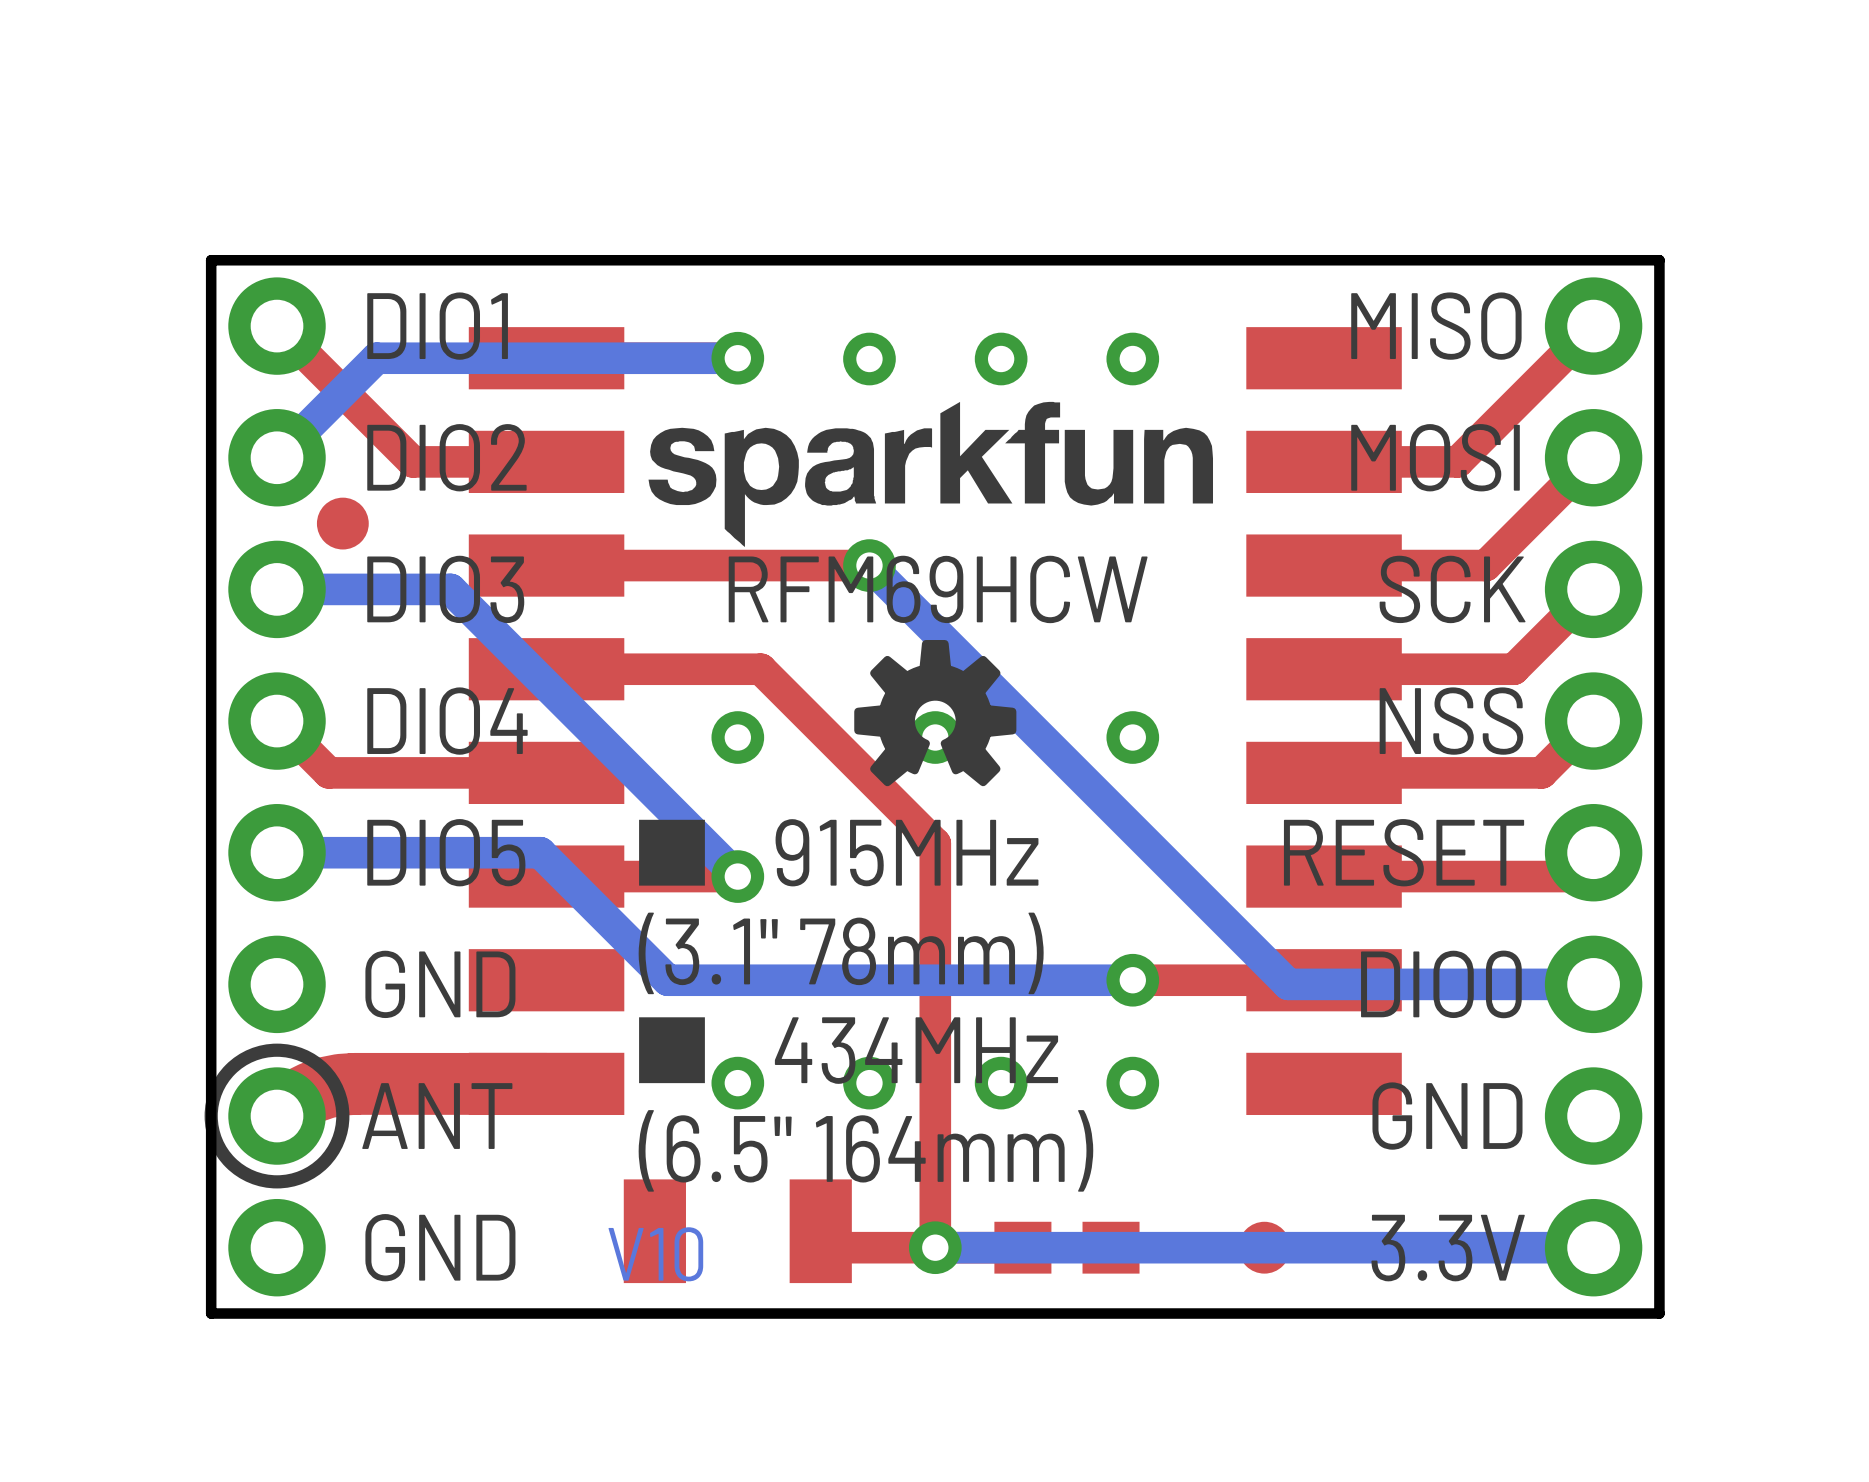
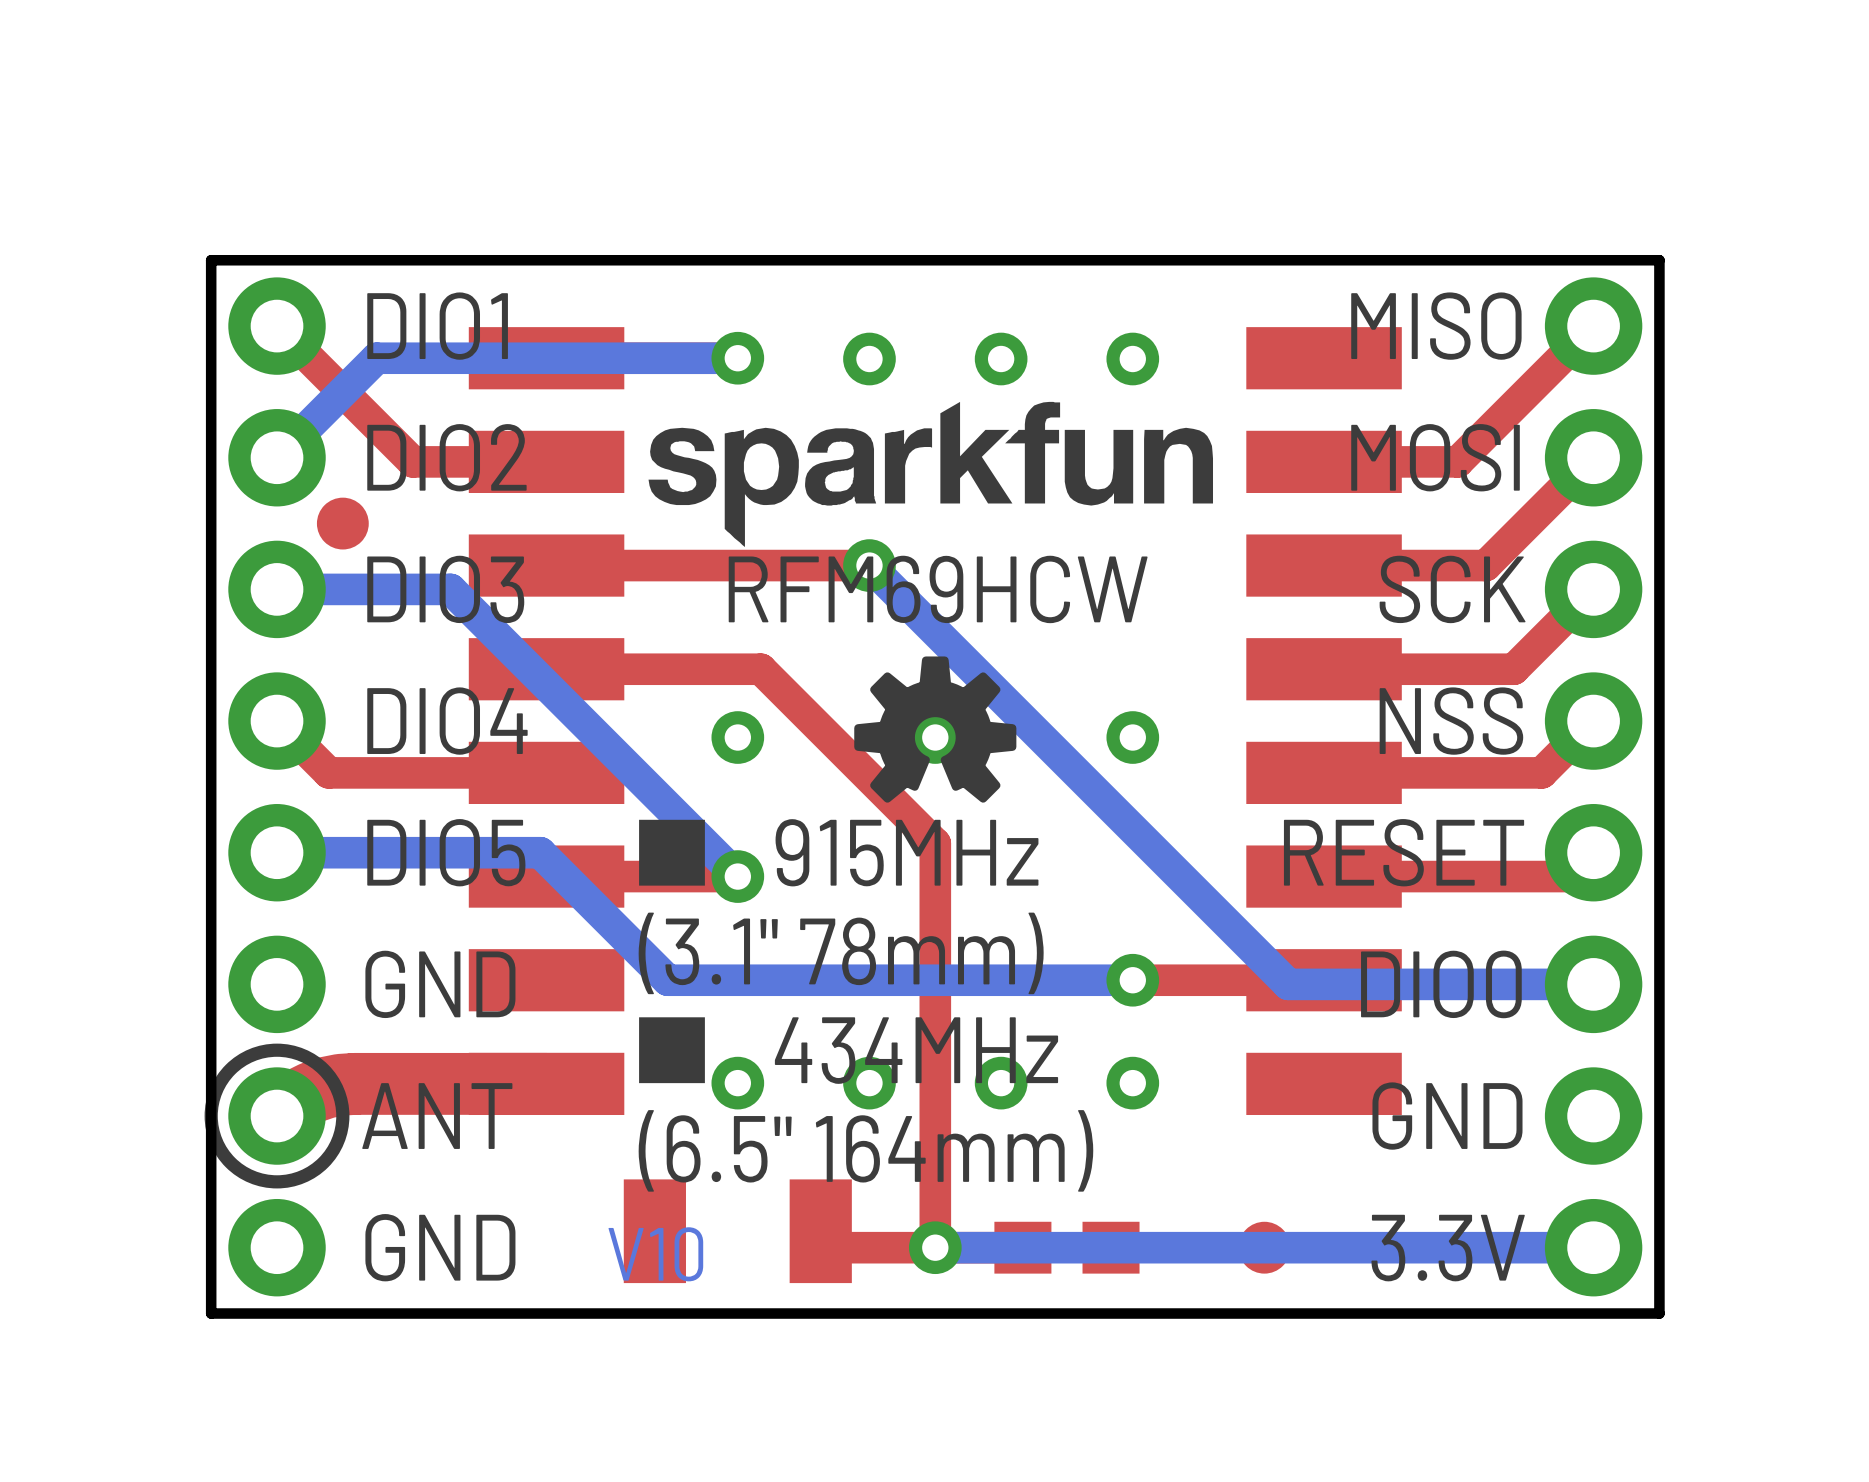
drawing position: (935, 713) -> (935, 729)

